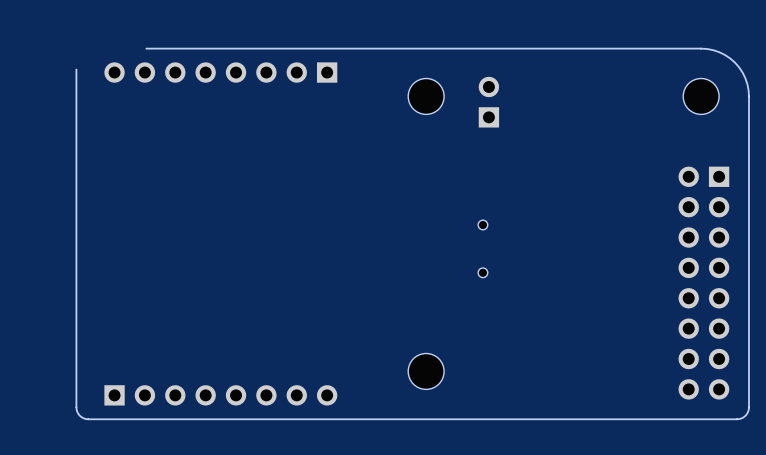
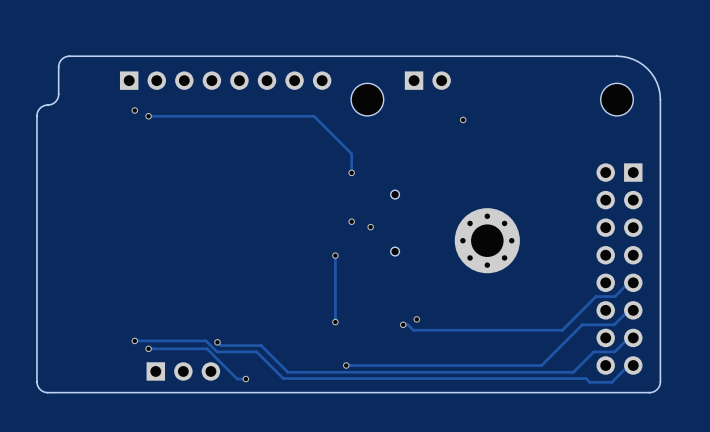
board edge: (76, 69) (76, 407) (79, 415) (88, 419) -> (113, 56) (69, 56) (62, 58) (58, 65) (57, 98) (53, 103) (41, 107) (37, 114) (37, 383) (43, 391) (60, 392)
part rotation: 0° (220, 72) -> 180° (225, 80)
part rotation: 0° (488, 102) -> 90° clockwise (427, 80)
via: none -> (134, 110)
track: none -> (148, 116) (314, 116) (351, 153) (351, 172)
via: none -> (148, 116)
via: none -> (463, 119)
via: none -> (351, 172)
part: none -> (395, 194)
part: (482, 224) -> none
via: none -> (351, 221)
via: none -> (370, 227)
part: none -> (487, 240)
part: none -> (395, 251)
track: none -> (335, 255) (335, 322)
via: none -> (335, 255)
part: (482, 272) -> none
track: none -> (628, 283) (614, 296) (596, 296) (562, 330) (413, 330) (407, 324) (403, 324)
track: none -> (628, 310) (614, 324) (582, 324) (541, 365) (346, 365)
via: none -> (416, 319)
via: none -> (335, 322)
via: none -> (403, 324)
track: none -> (628, 338) (614, 351) (593, 351) (573, 372) (287, 372) (261, 345) (220, 345) (217, 342)
track: none -> (134, 340) (206, 340) (217, 351) (256, 351) (283, 378) (586, 378) (589, 382) (611, 382) (628, 365)
via: none -> (134, 340)
via: none -> (217, 342)
track: none -> (148, 348) (207, 348) (237, 379) (245, 379)
via: none -> (148, 348)
part: (426, 371) -> none
part footprint: [104, 385, 338, 406] -> [146, 362, 221, 381]
via: none -> (346, 365)
via: none -> (245, 379)

